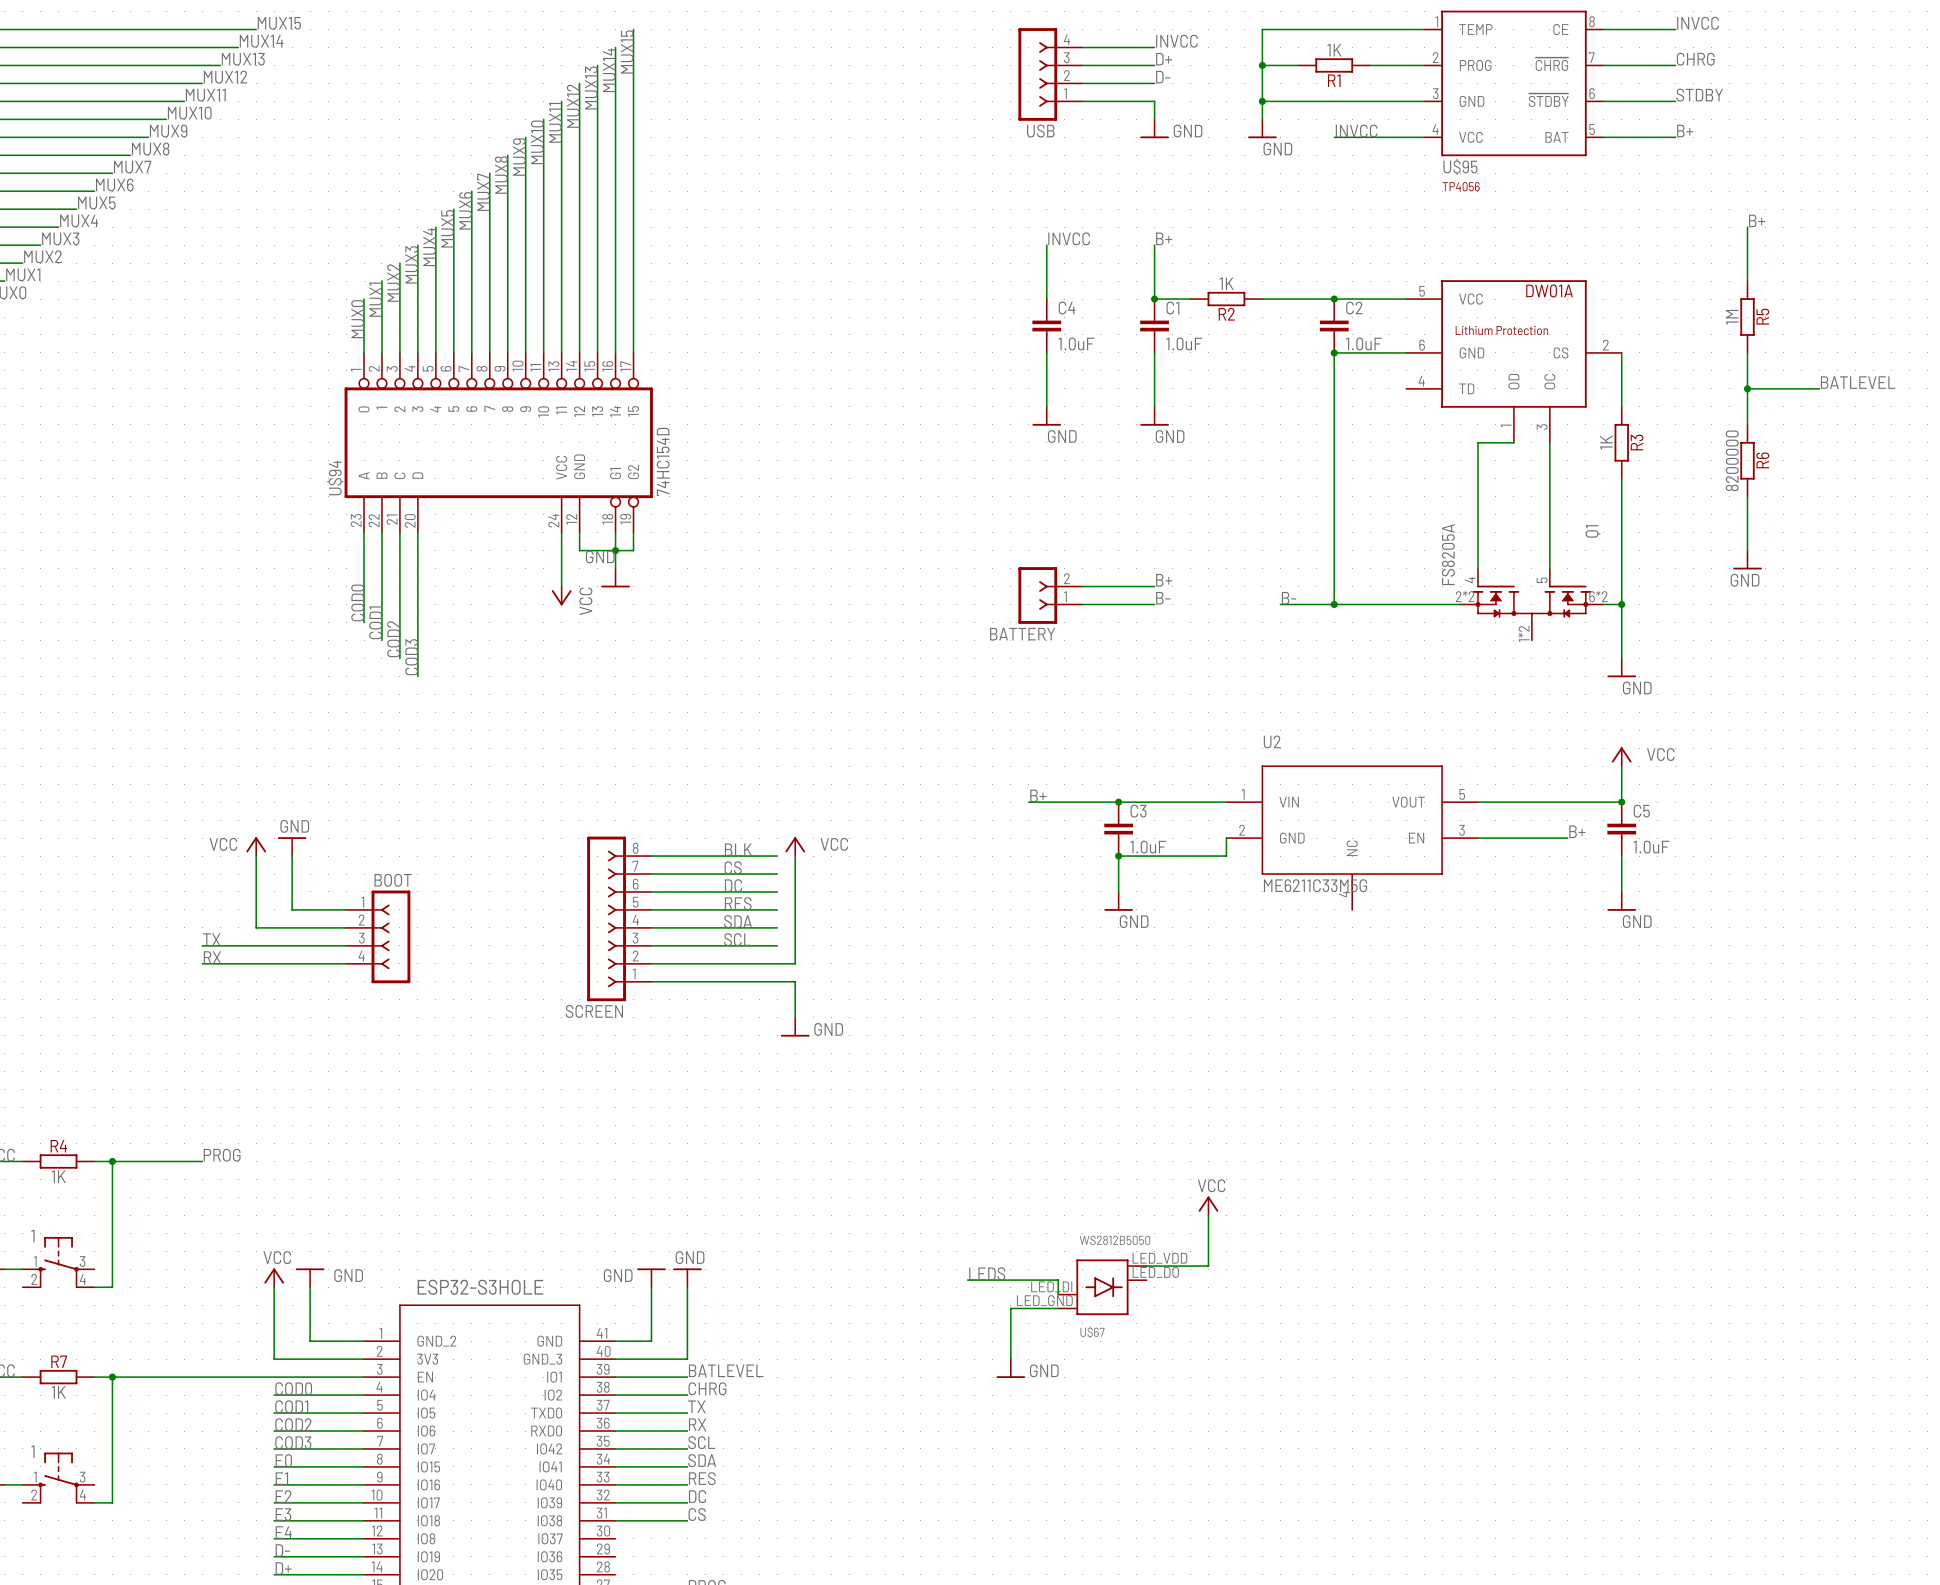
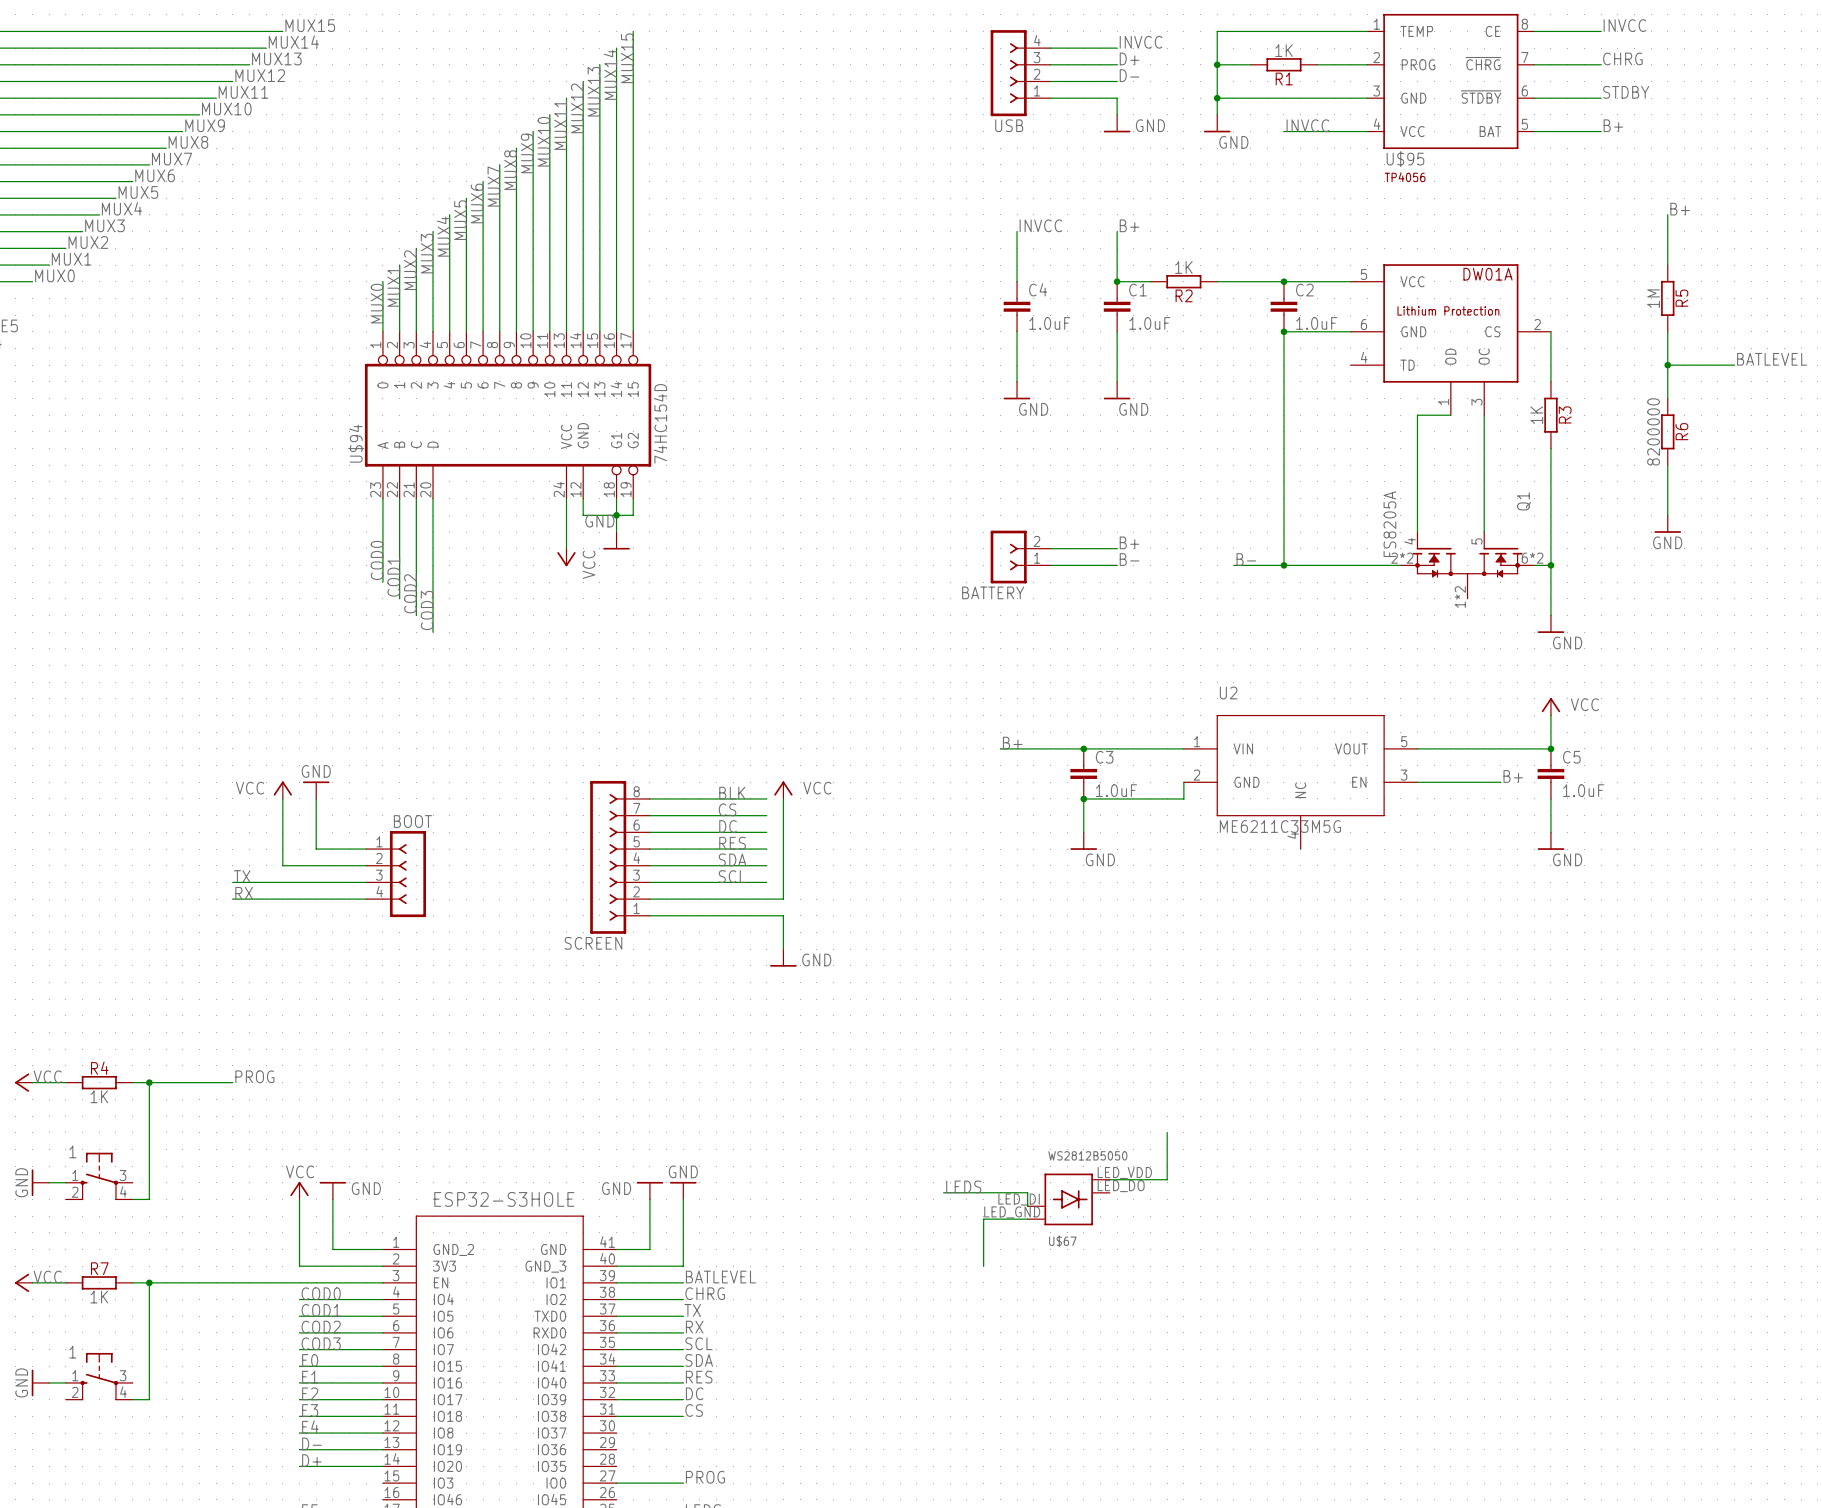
power symbol: VCC (1208, 1205) -> none
power symbol: GND (1010, 1368) -> none

